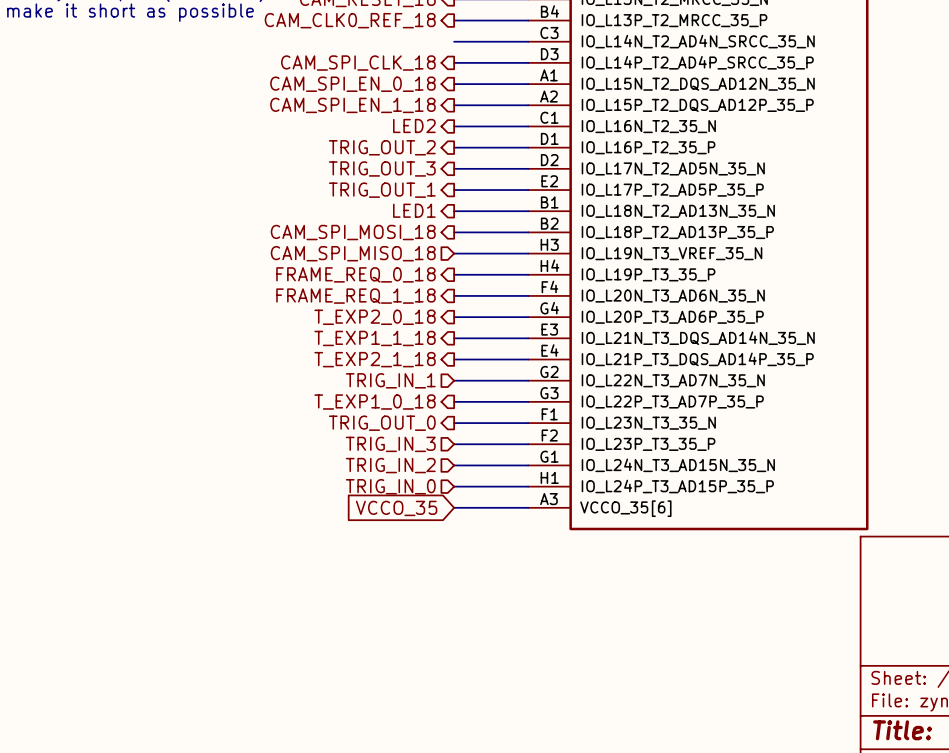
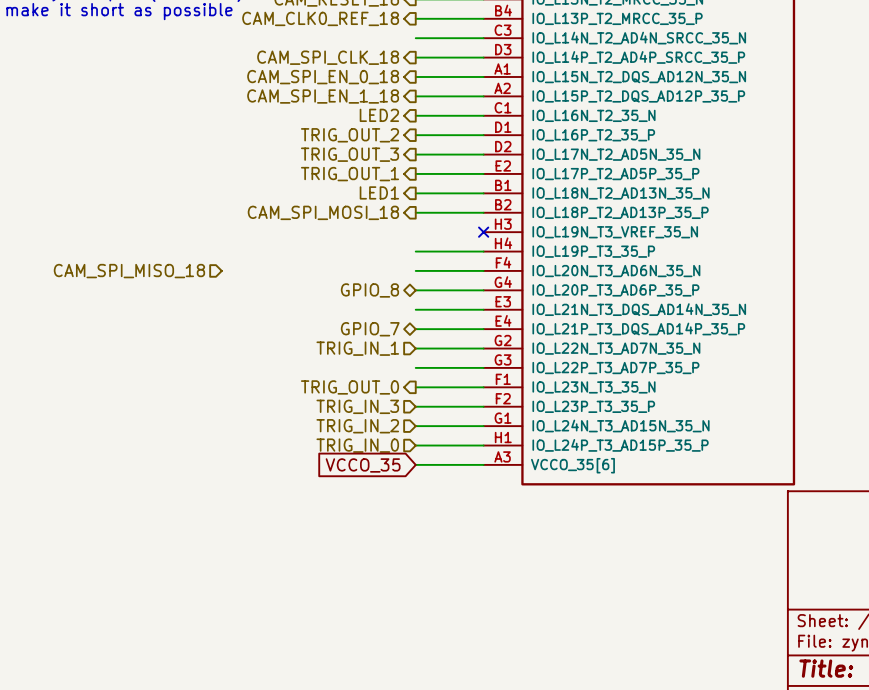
hierarchical label: CAM_SPI_MISO_18 (353, 253) -> none
wire: (454, 253) (528, 253) -> none
no-connect mark: none -> (483, 232)
hierarchical label: FRAME_REQ_0_18 (355, 274) -> none
hierarchical label: none -> CAM_SPI_MISO_18 (129, 271)
hierarchical label: FRAME_REQ_1_18 (355, 296) -> none
hierarchical label shape: output (375, 317) -> bidirectional (369, 290)
hierarchical label: T_EXP2_0_18 (375, 317) -> GPIO_8 (369, 290)
hierarchical label: T_EXP1_1_18 (375, 338) -> none
hierarchical label shape: output (375, 359) -> bidirectional (370, 329)
hierarchical label: T_EXP2_1_18 (375, 359) -> GPIO_7 (370, 329)
hierarchical label: T_EXP1_0_18 (375, 402) -> none

